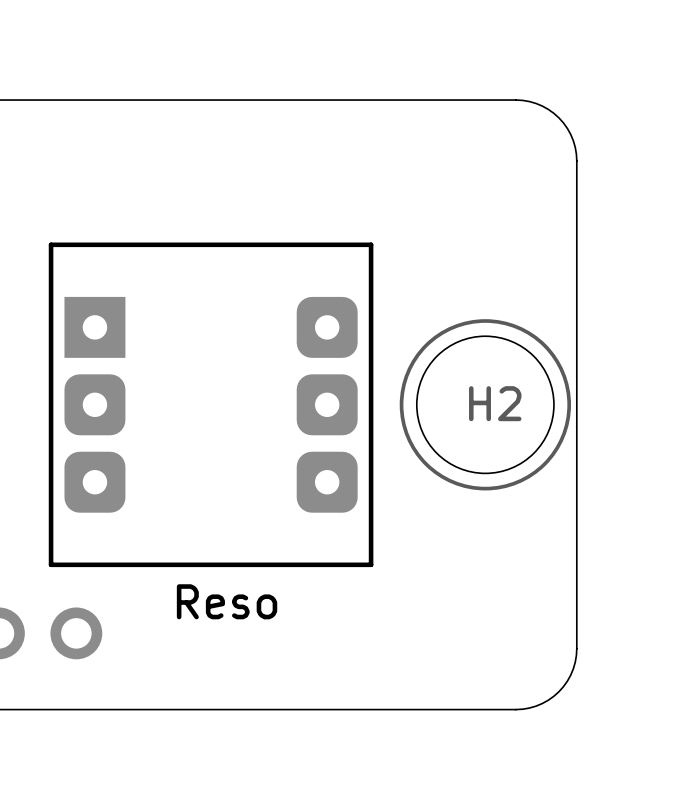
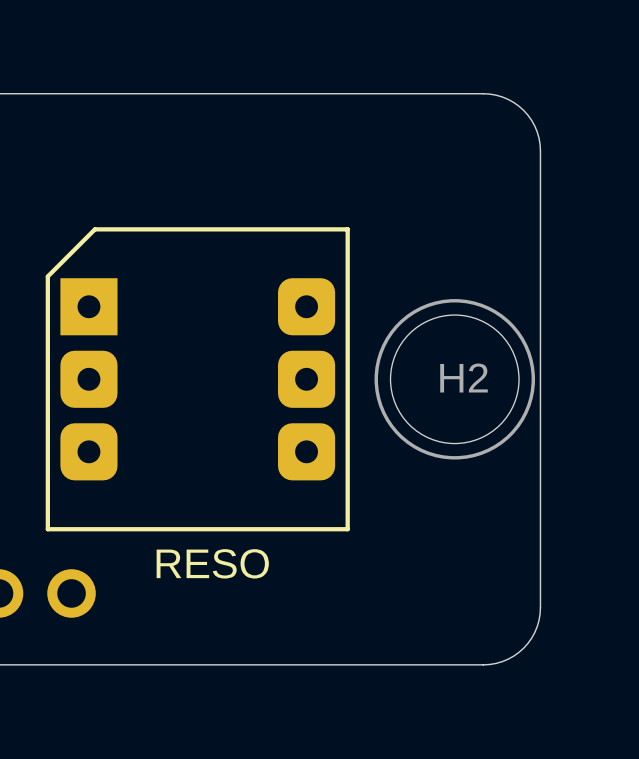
part footprint: [48, 242, 374, 568] -> [45, 227, 350, 532]
text: Reso (227, 601) -> RESO (212, 563)

